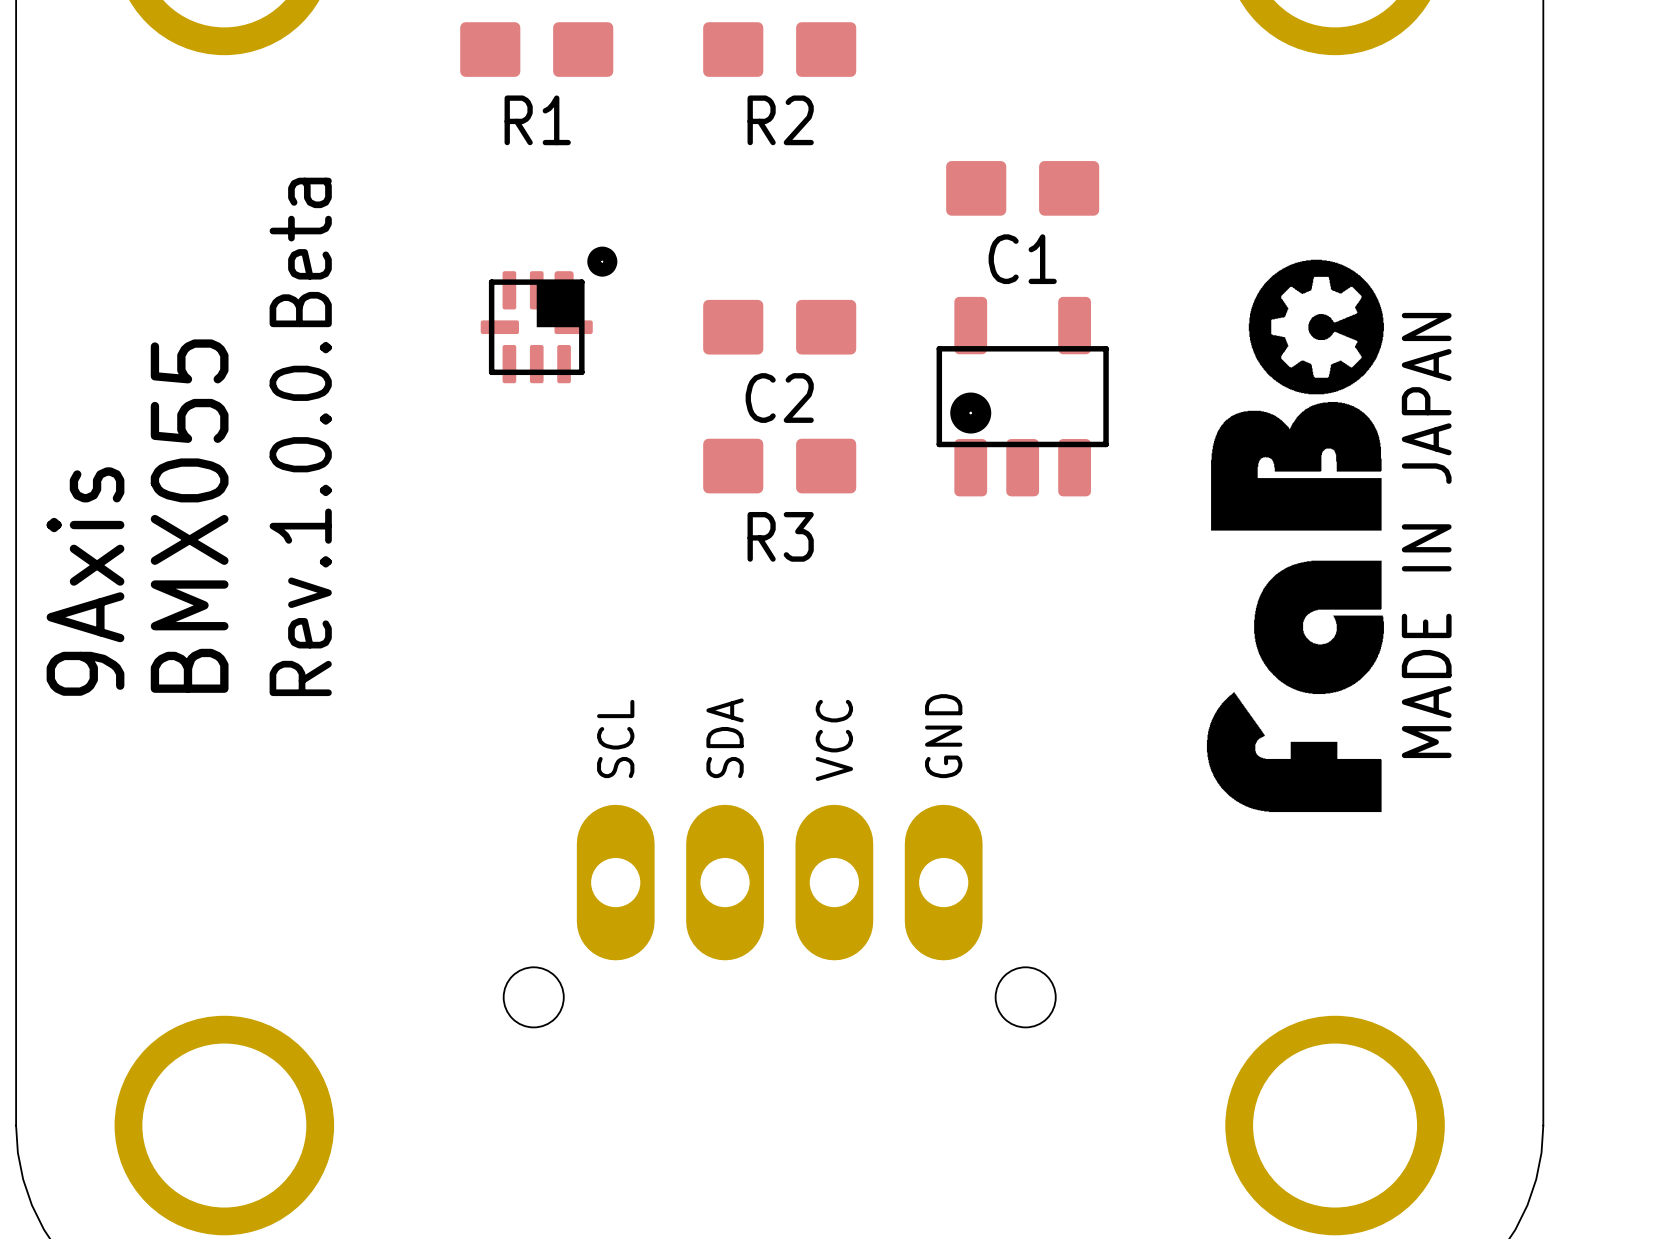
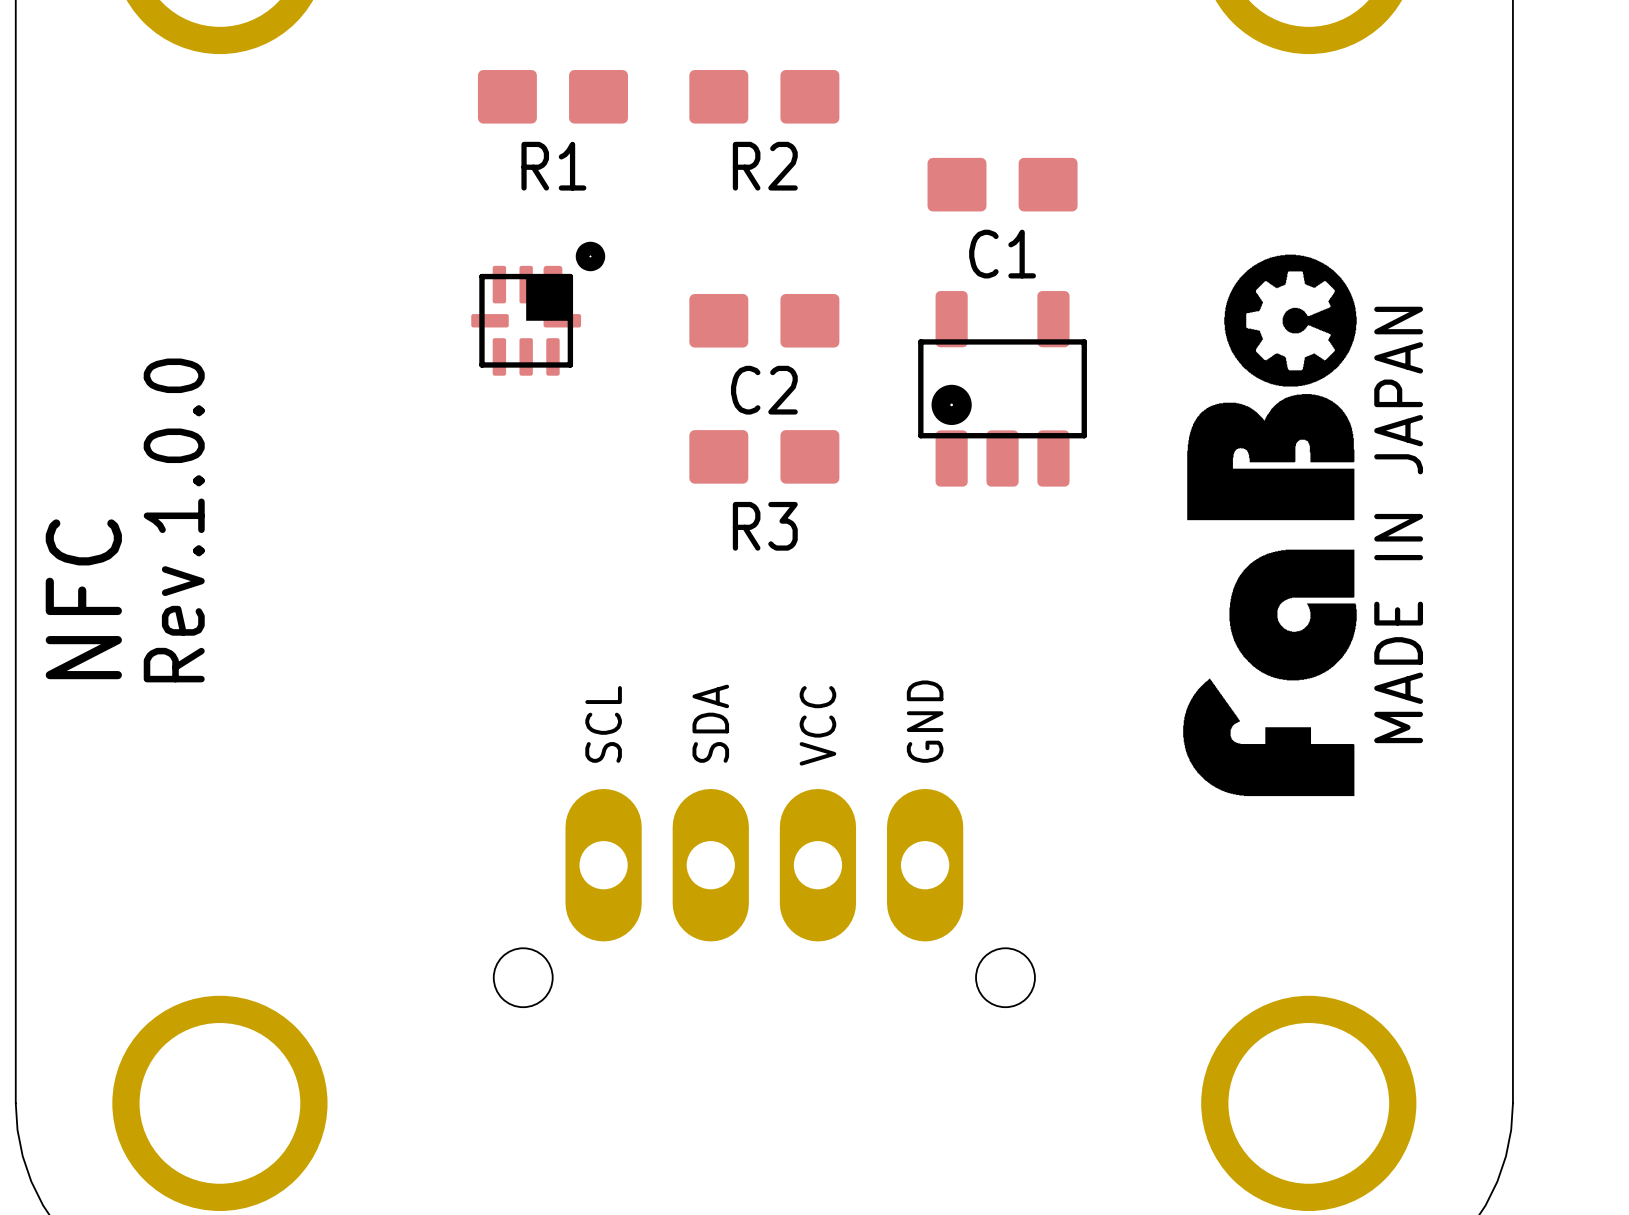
R1 position: (536, 49) -> (552, 96)
R2 position: (779, 49) -> (764, 96)
text: Rev.1.0.0.Beta (300, 436) -> none
text: BMX055 (189, 516) -> Rev.1.0.0 (174, 520)
text: 9Axis (85, 581) -> NFC (83, 599)

